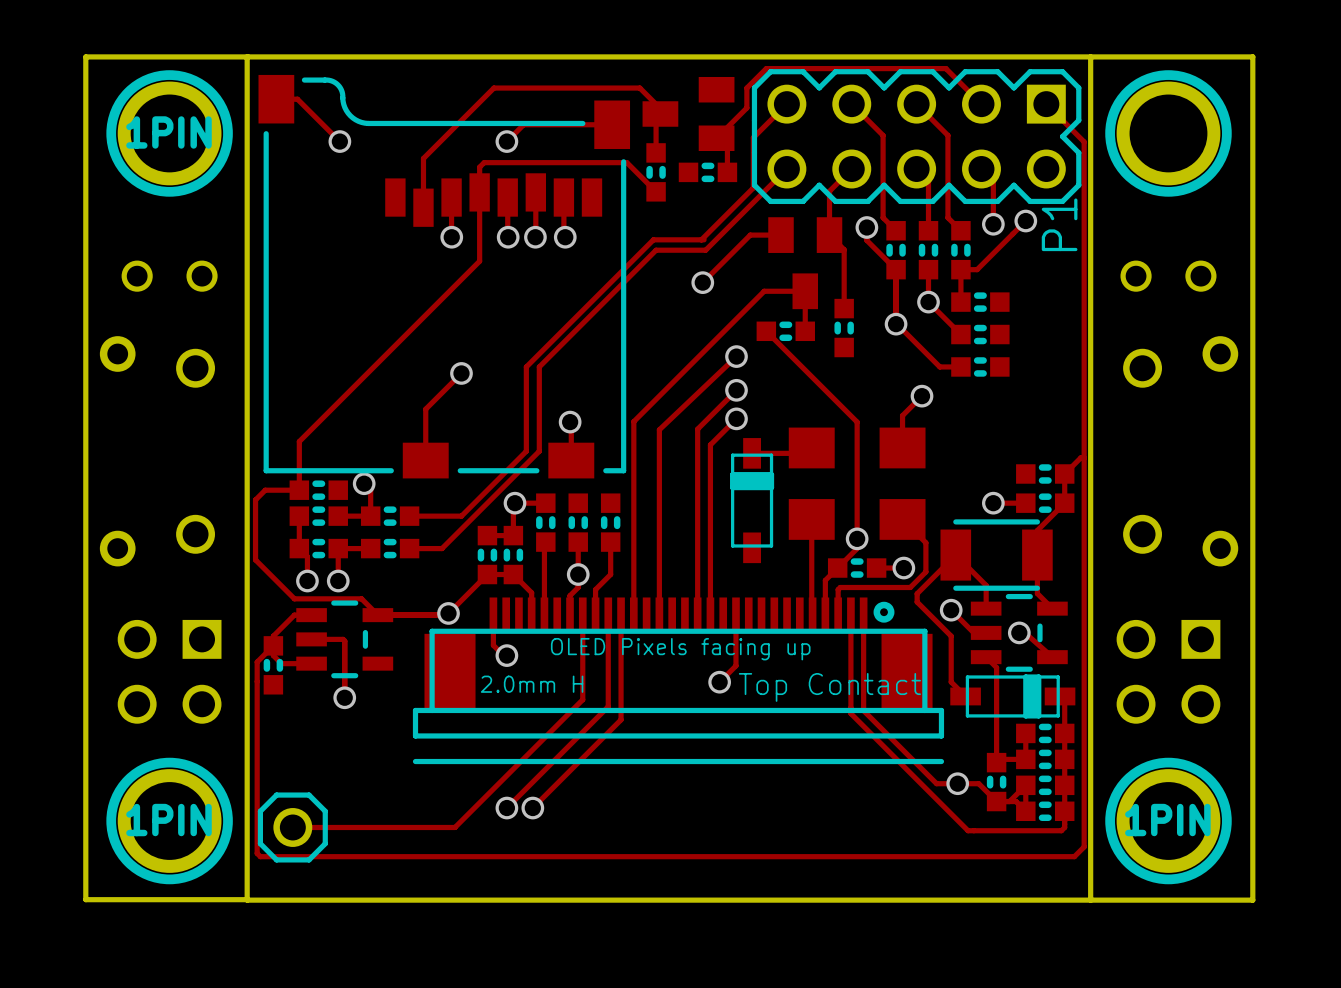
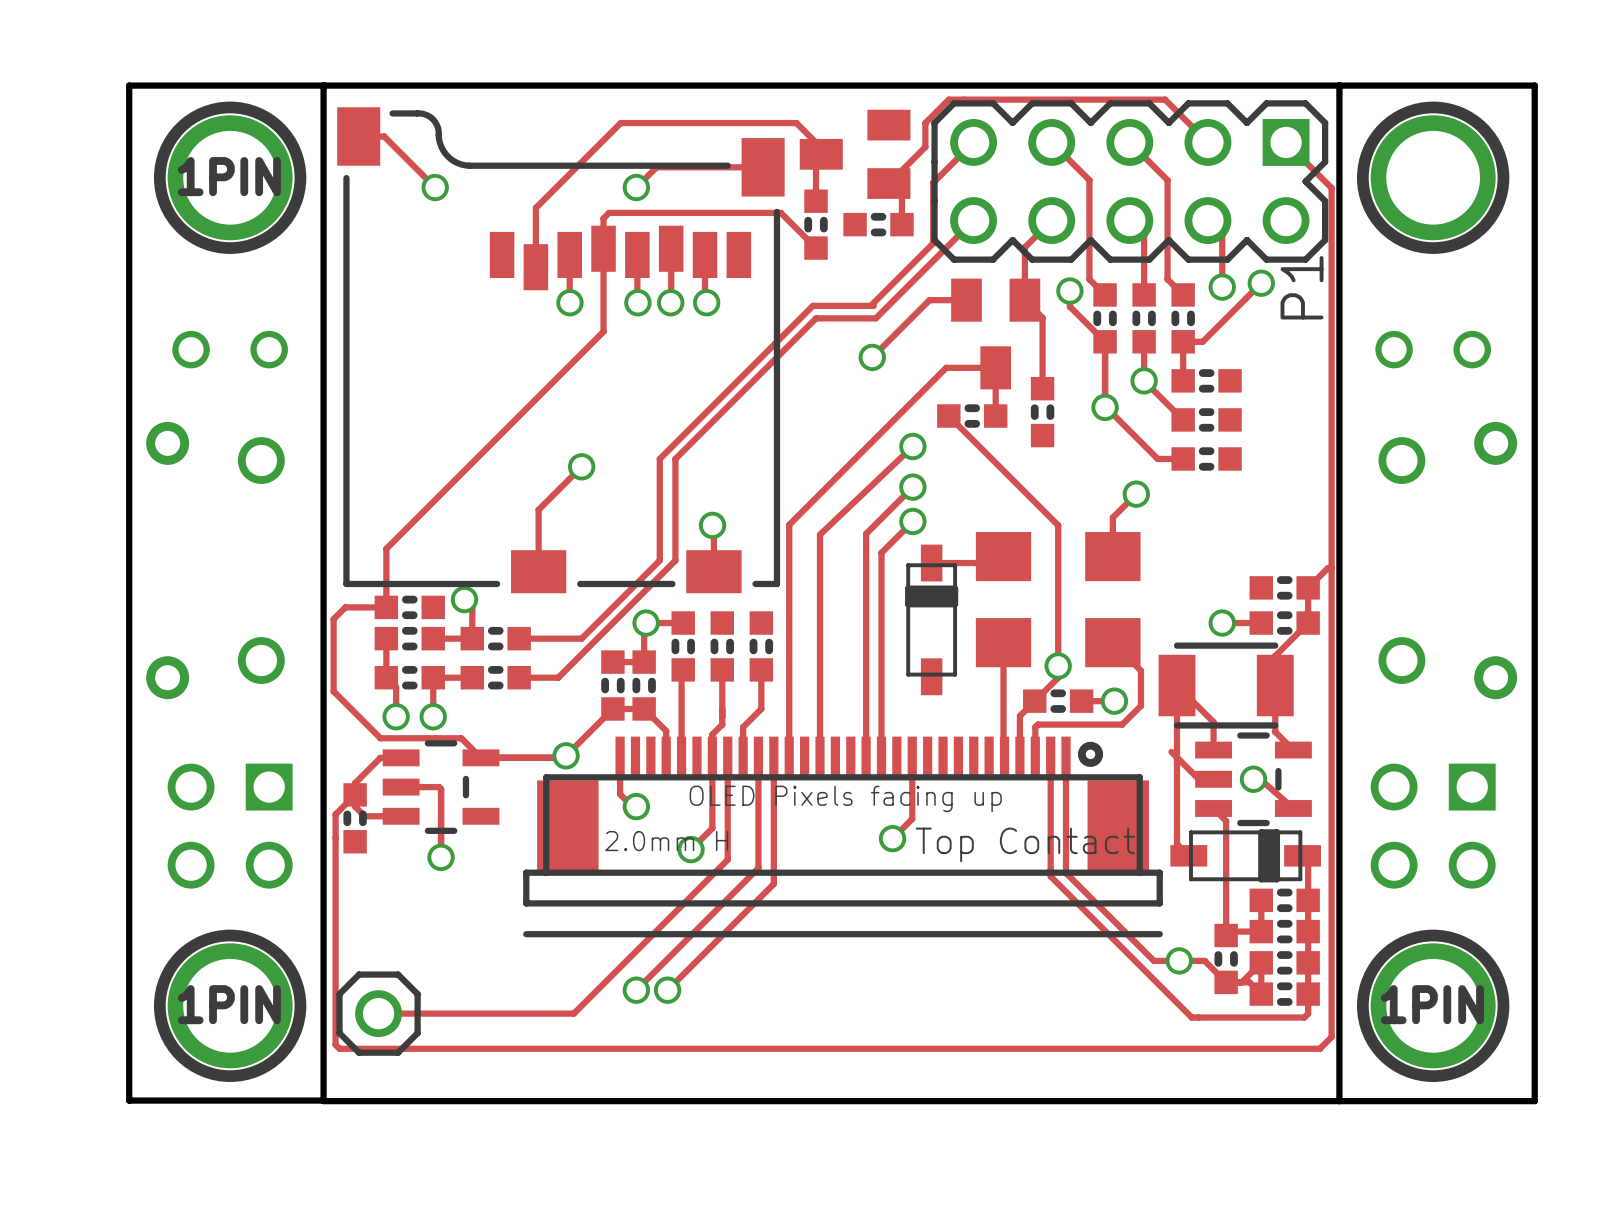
track: (955, 555) (917, 593) (917, 602) (951, 636) (951, 682) (955, 686) -> (1177, 685) (1177, 844)
via position: (578, 574) -> (691, 849)
via: (951, 610) -> none
track: none -> (712, 755) (712, 828) (691, 849)

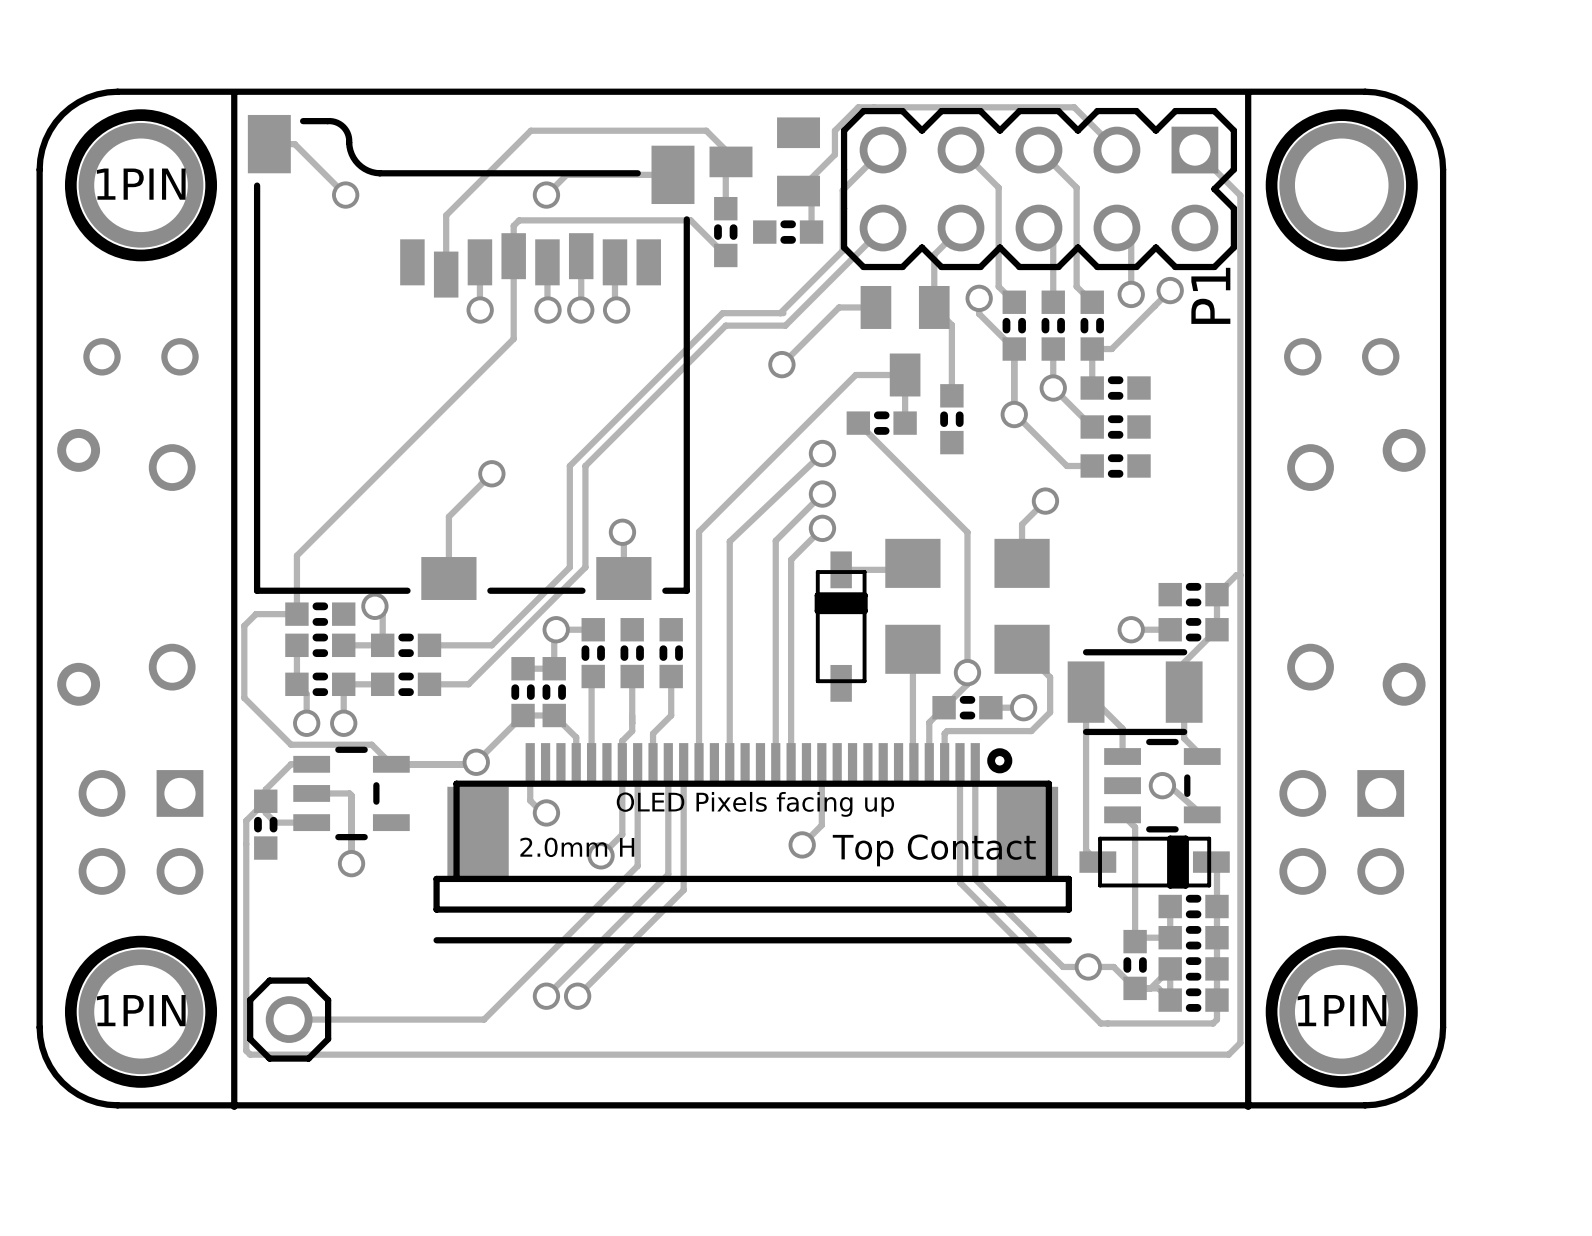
board edge: (129, 85) (129, 1100) -> none
board edge: (129, 85) (1534, 85) (1534, 162) -> none
track: (1171, 751) (1198, 779) (1213, 779) -> none
board edge: (1534, 1021) (1534, 1101) (323, 1101) -> (1443, 1027) (1437, 1057) (1420, 1082) (1394, 1099) (1365, 1105) (117, 1105) (87, 1099) (62, 1082) (45, 1057) (39, 1027) (39, 169) (42, 149) (50, 130) (62, 114) (78, 102) (97, 94) (117, 91) (1365, 91) (1394, 97) (1420, 114) (1437, 139) (1443, 169)
board edge: (129, 1100) (324, 1100) -> none

